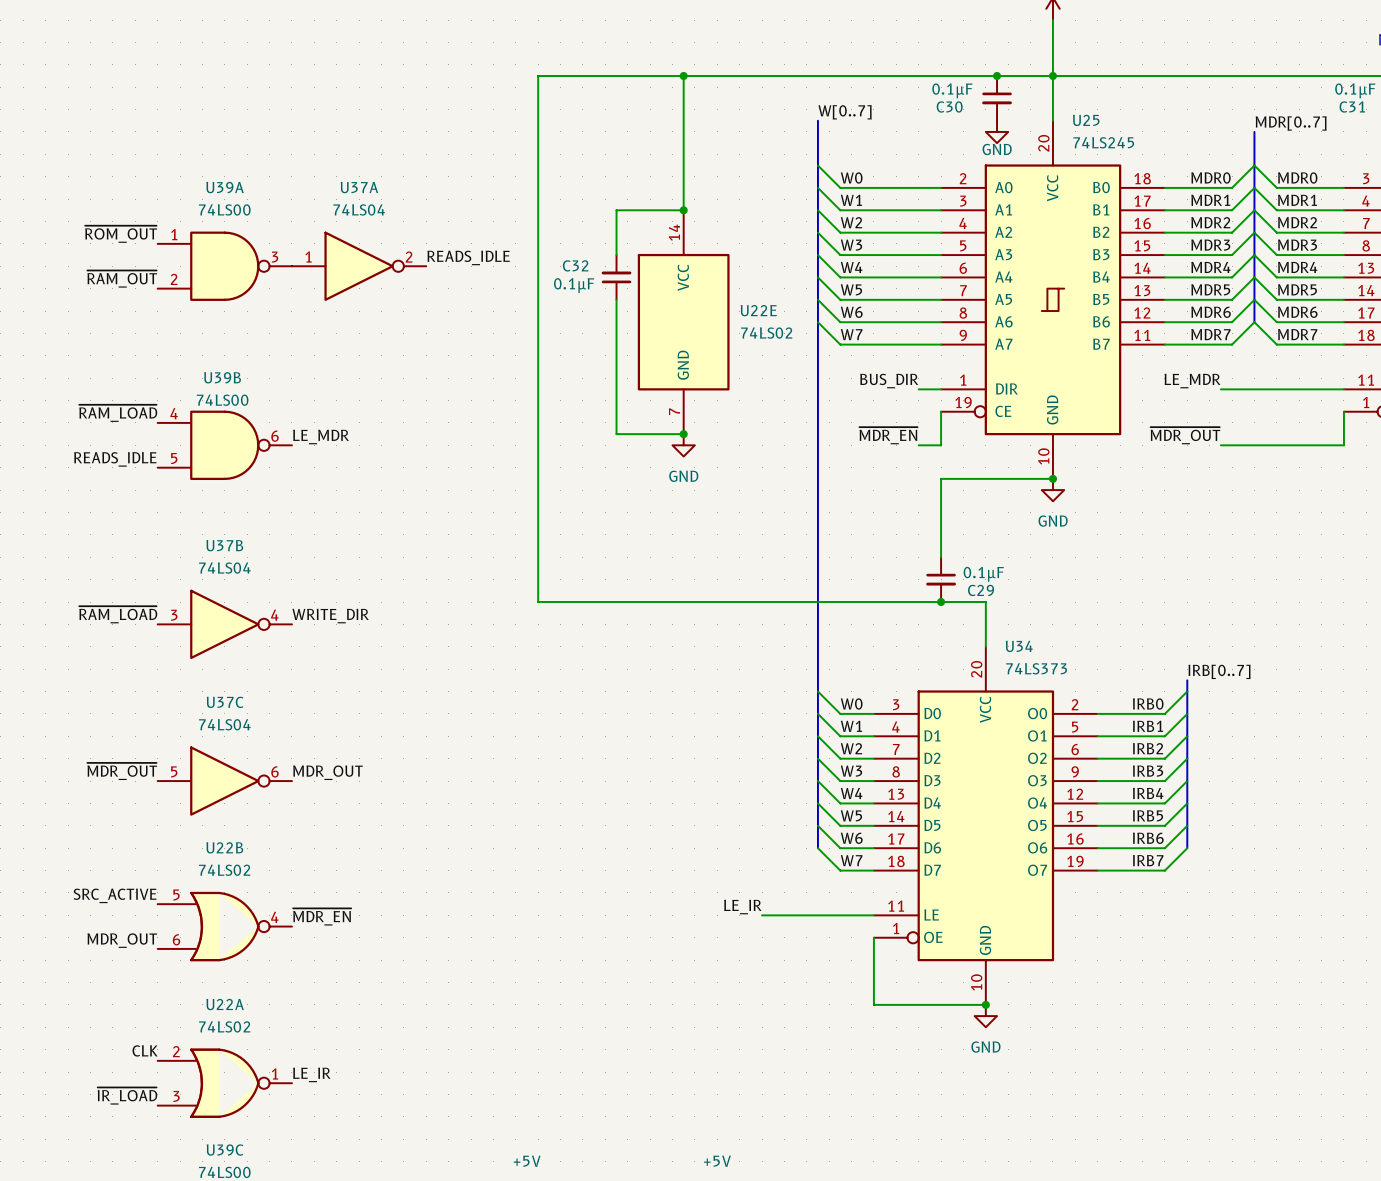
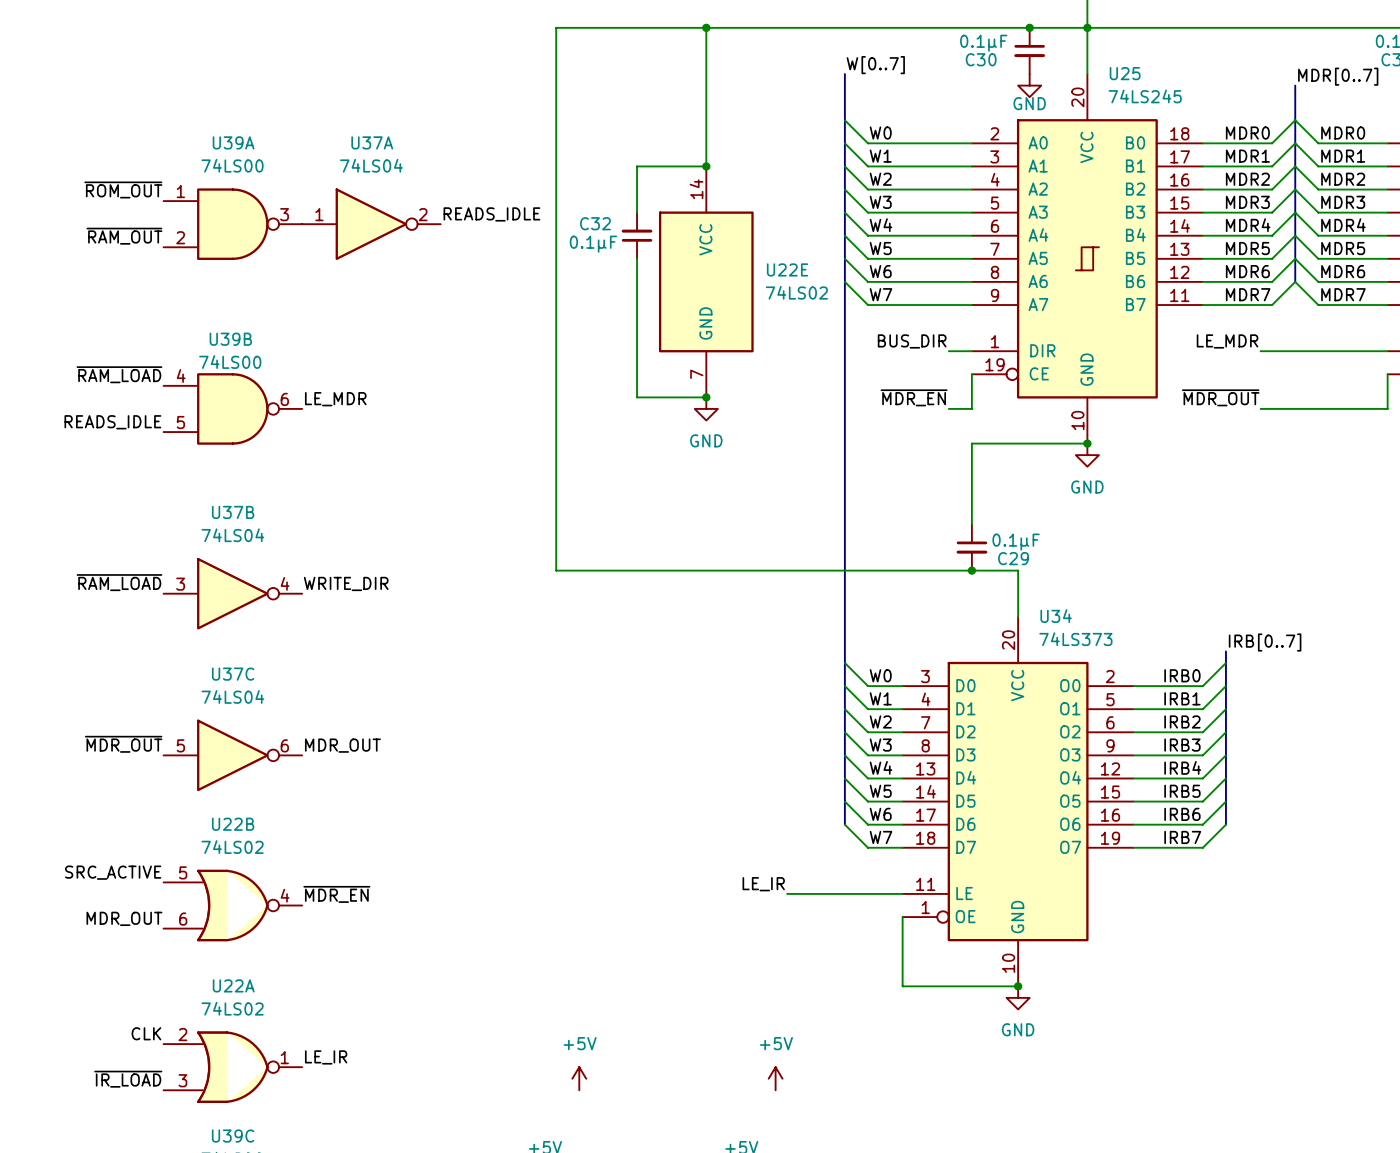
power symbol: none -> +5V (579, 1078)
power symbol: none -> +5V (775, 1078)

